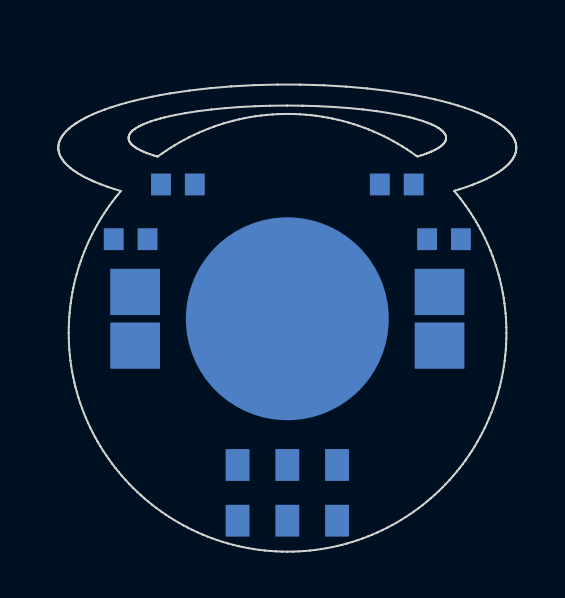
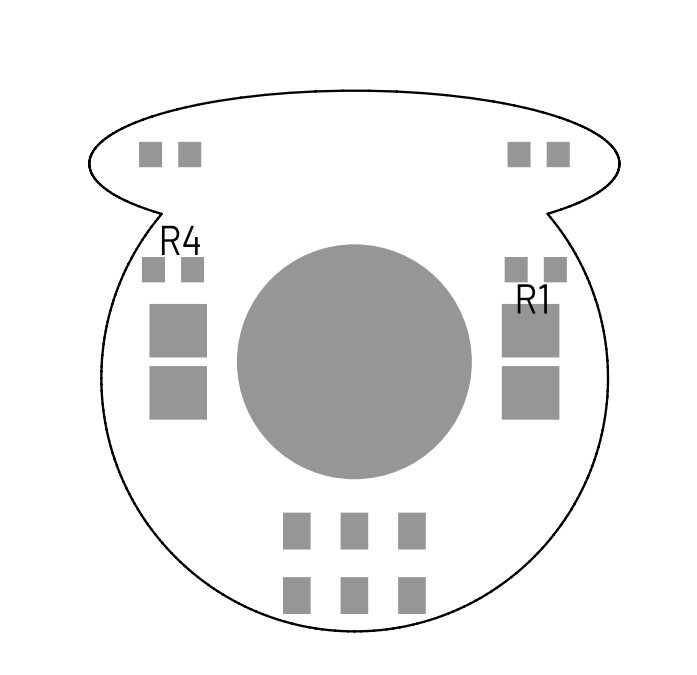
board edge: (287, 105) (348, 108) (398, 114) (434, 126) (443, 132) (446, 139) (438, 148) (417, 156) (387, 138) (354, 124) (322, 116) (289, 113) (255, 116) (218, 125) (188, 137) (157, 156) (137, 148) (128, 139) (130, 132) (137, 126) (169, 116) (225, 108) (287, 105) -> none
part position: (177, 184) -> (170, 154)
part position: (396, 184) -> (538, 154)
R4 name: none -> R4 (180, 240)
R1 name: none -> R1 (532, 298)

